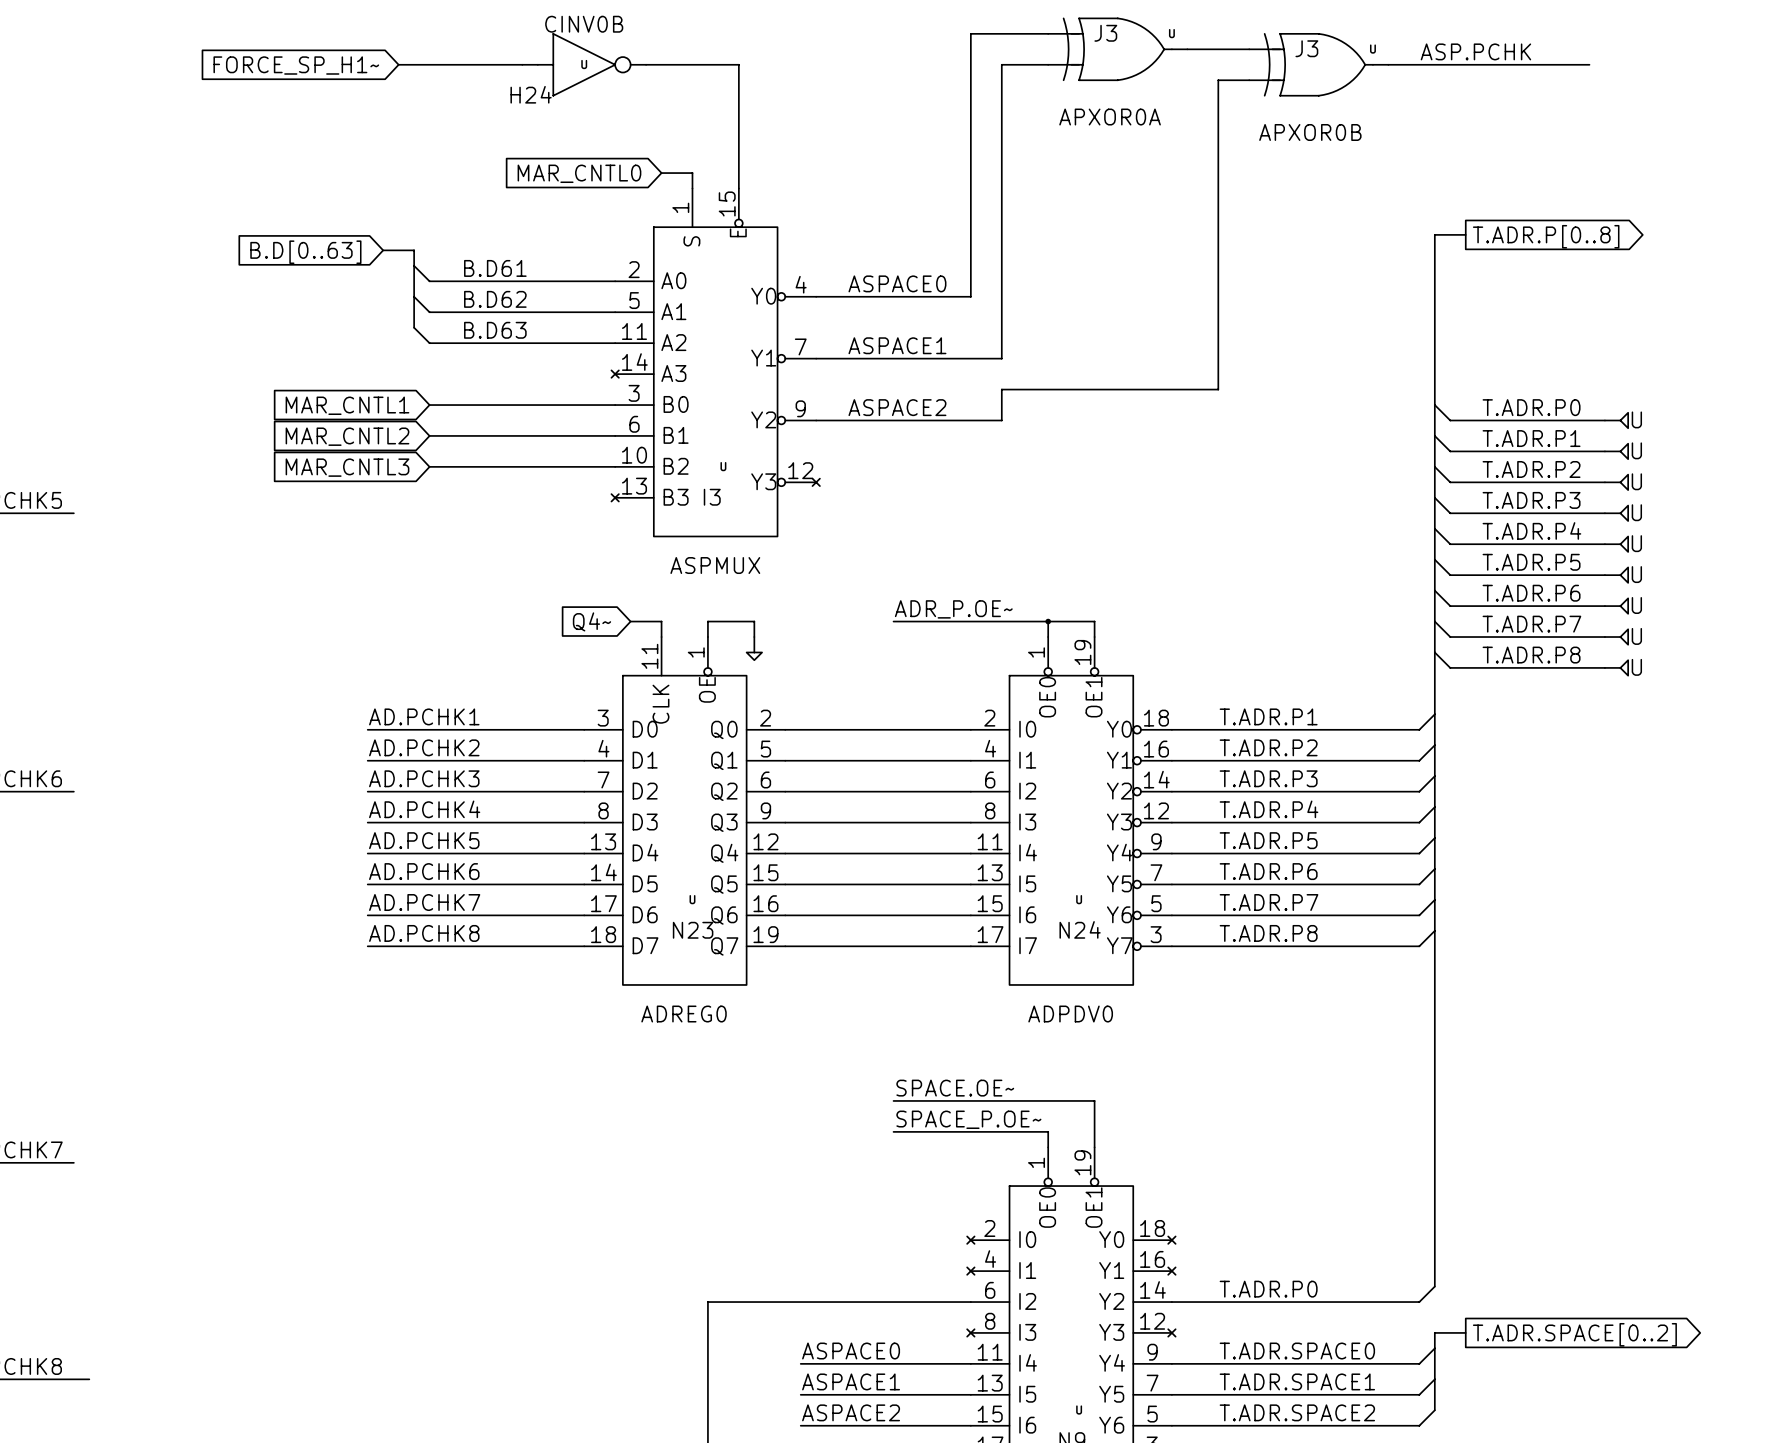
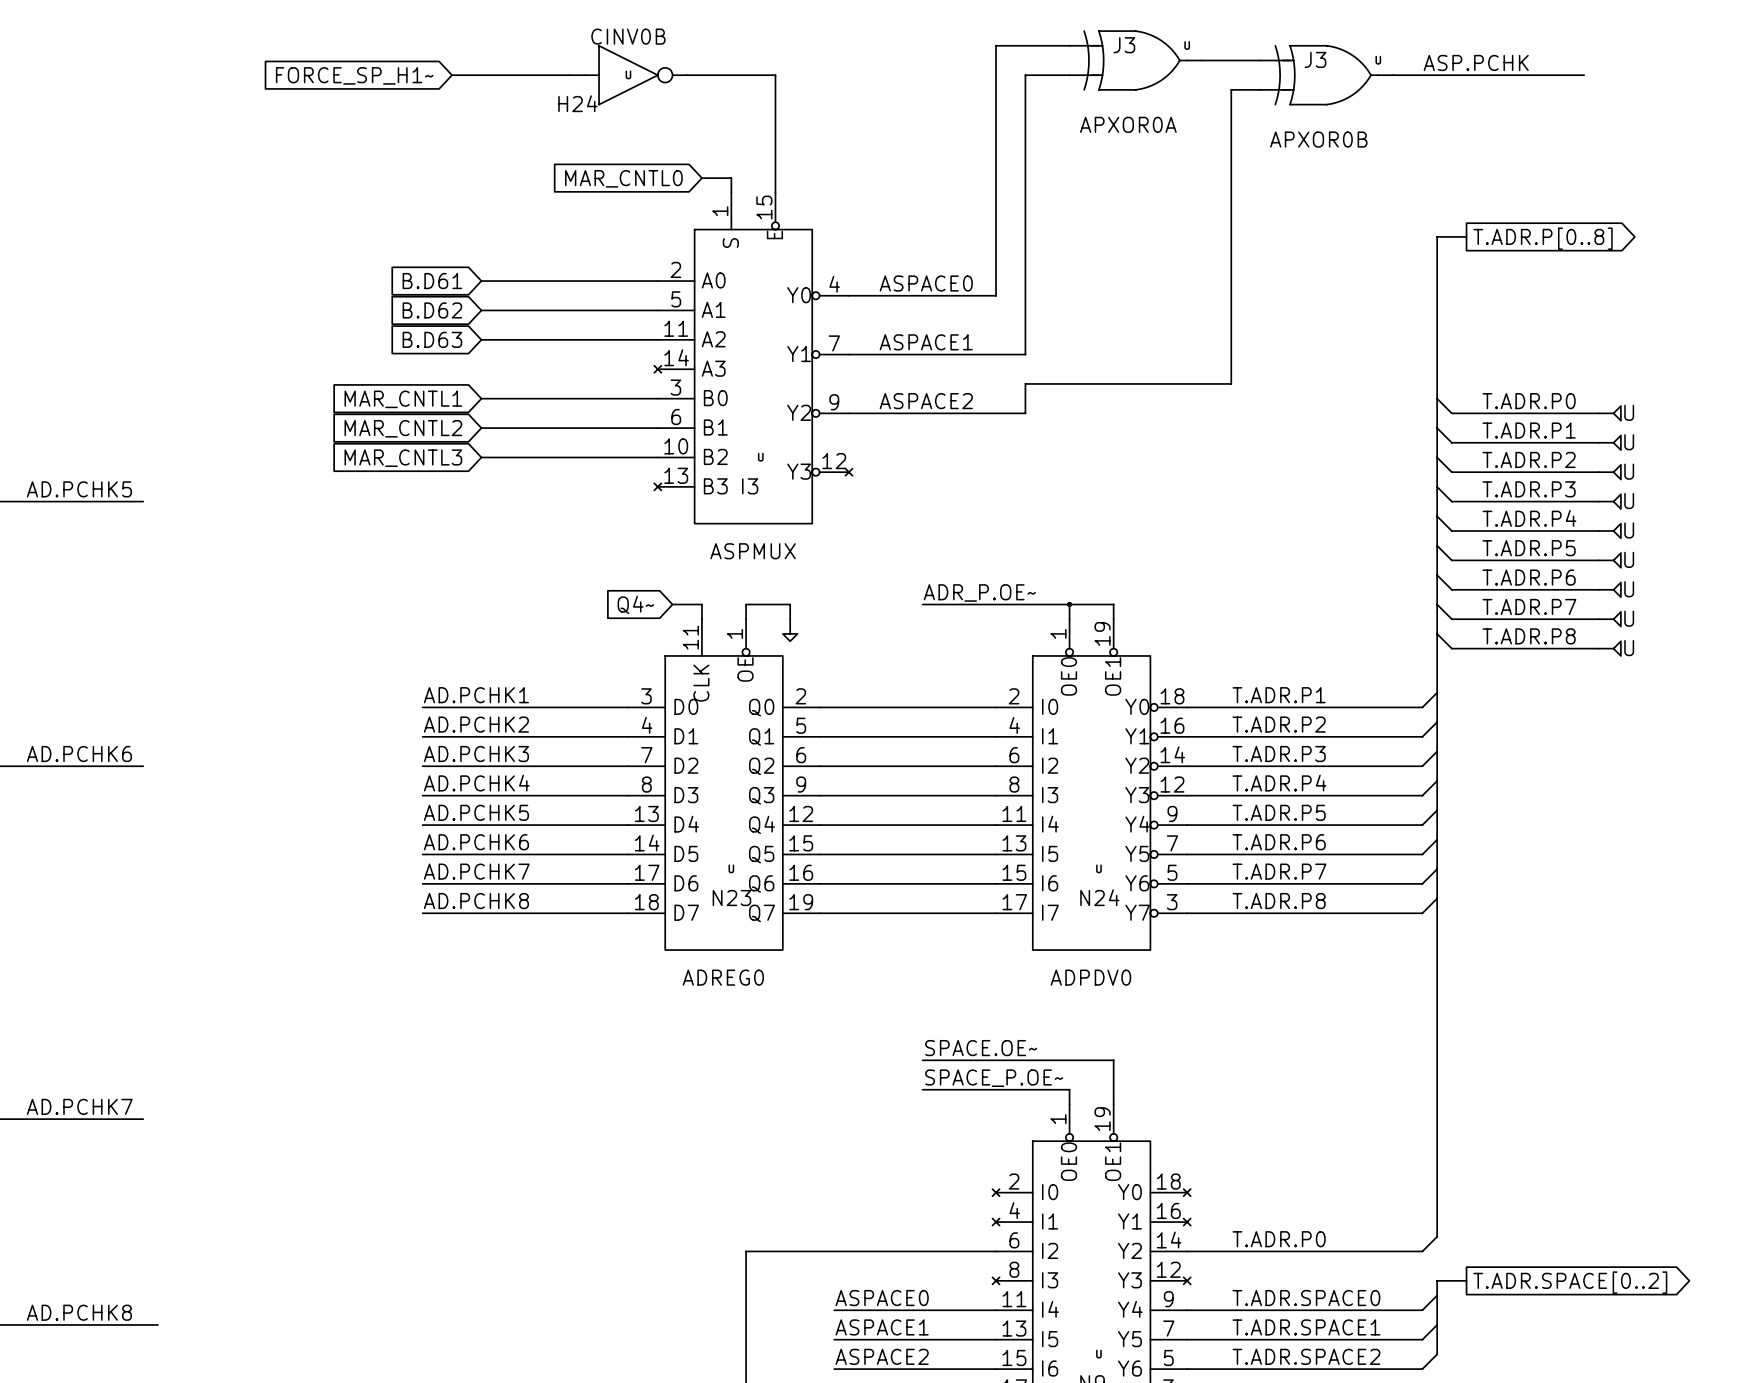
bus: (383, 250) (414, 250) (414, 327) -> none
global label: B.D[0..63] (305, 252) -> none
label: B.D61 (495, 268) -> none
global label: none -> B.D61 (432, 281)
label: B.D62 (495, 299) -> none
global label: none -> B.D62 (432, 310)
label: B.D63 (495, 330) -> none
global label: none -> B.D63 (432, 339)

